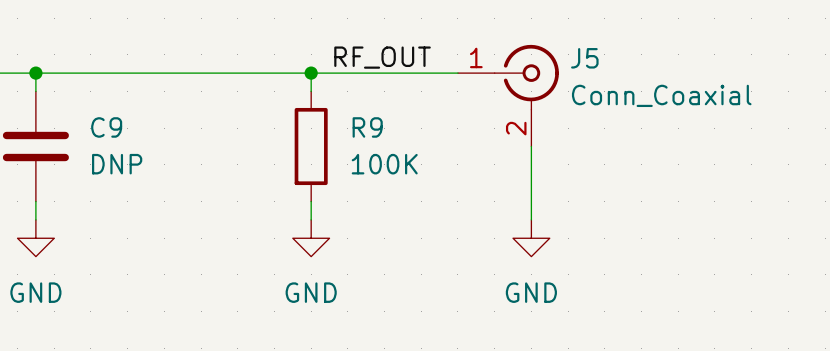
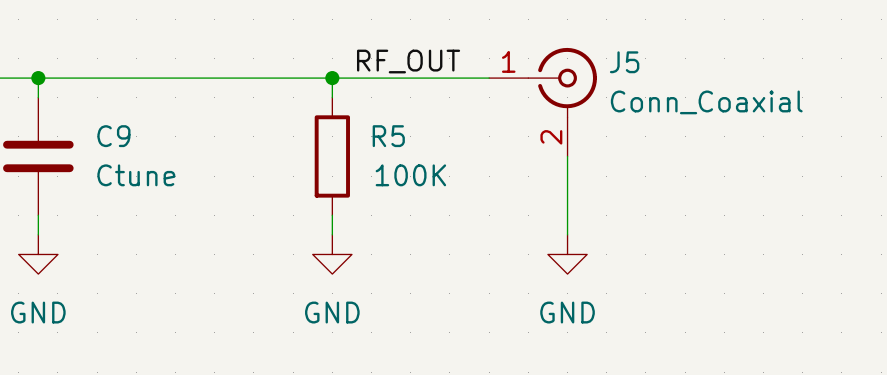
R9 name: R9 (367, 127) -> R5 (388, 136)
C9 value: DNP (117, 164) -> Ctune (136, 175)

